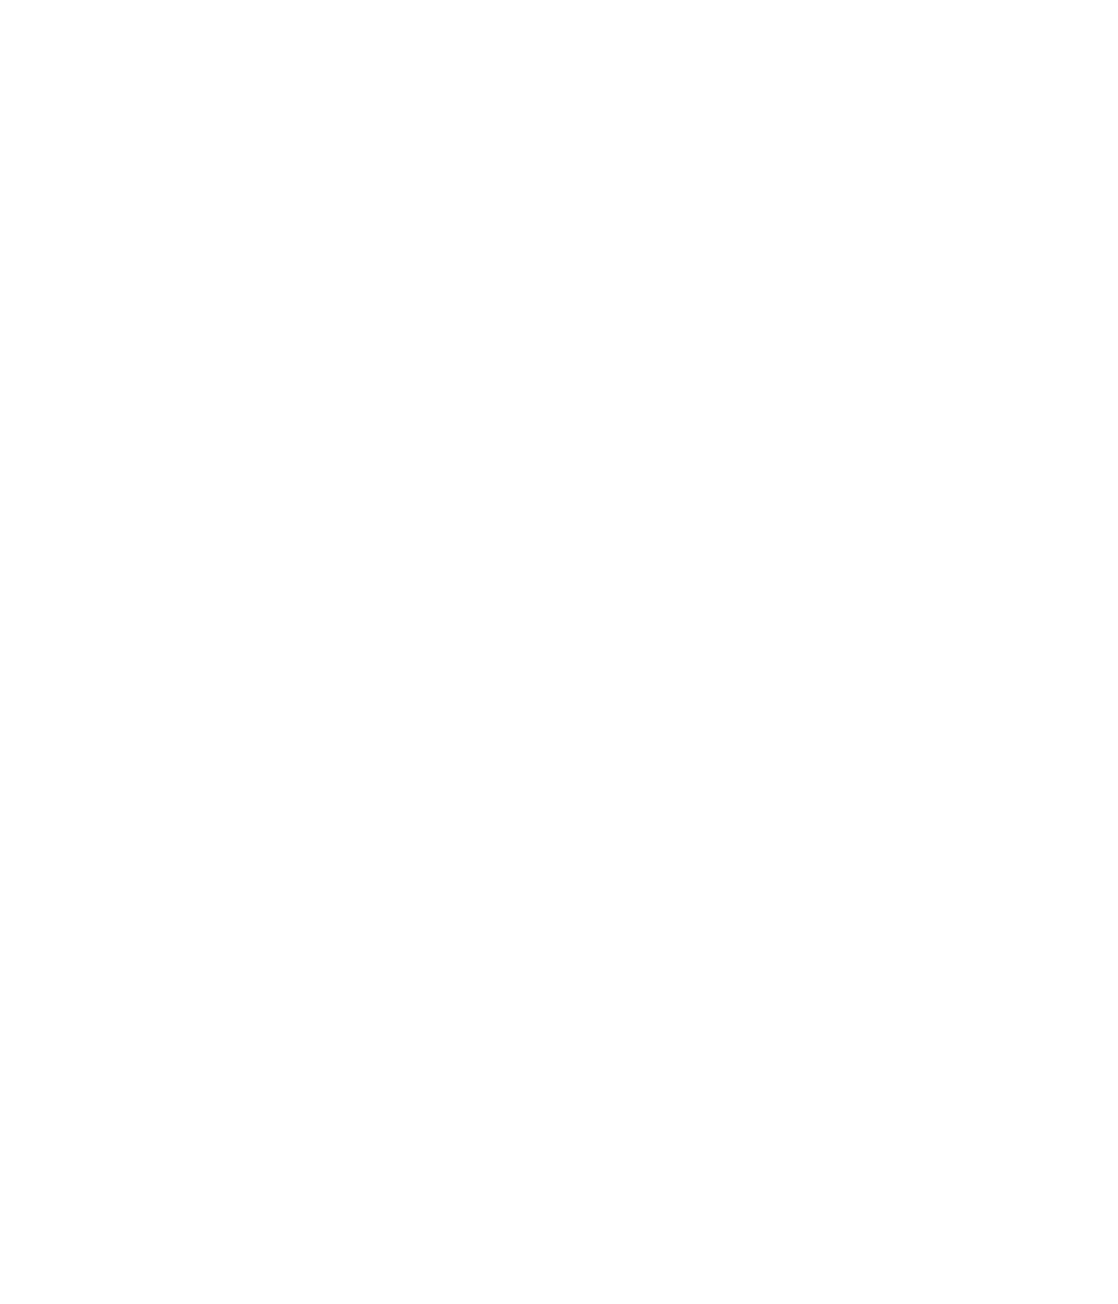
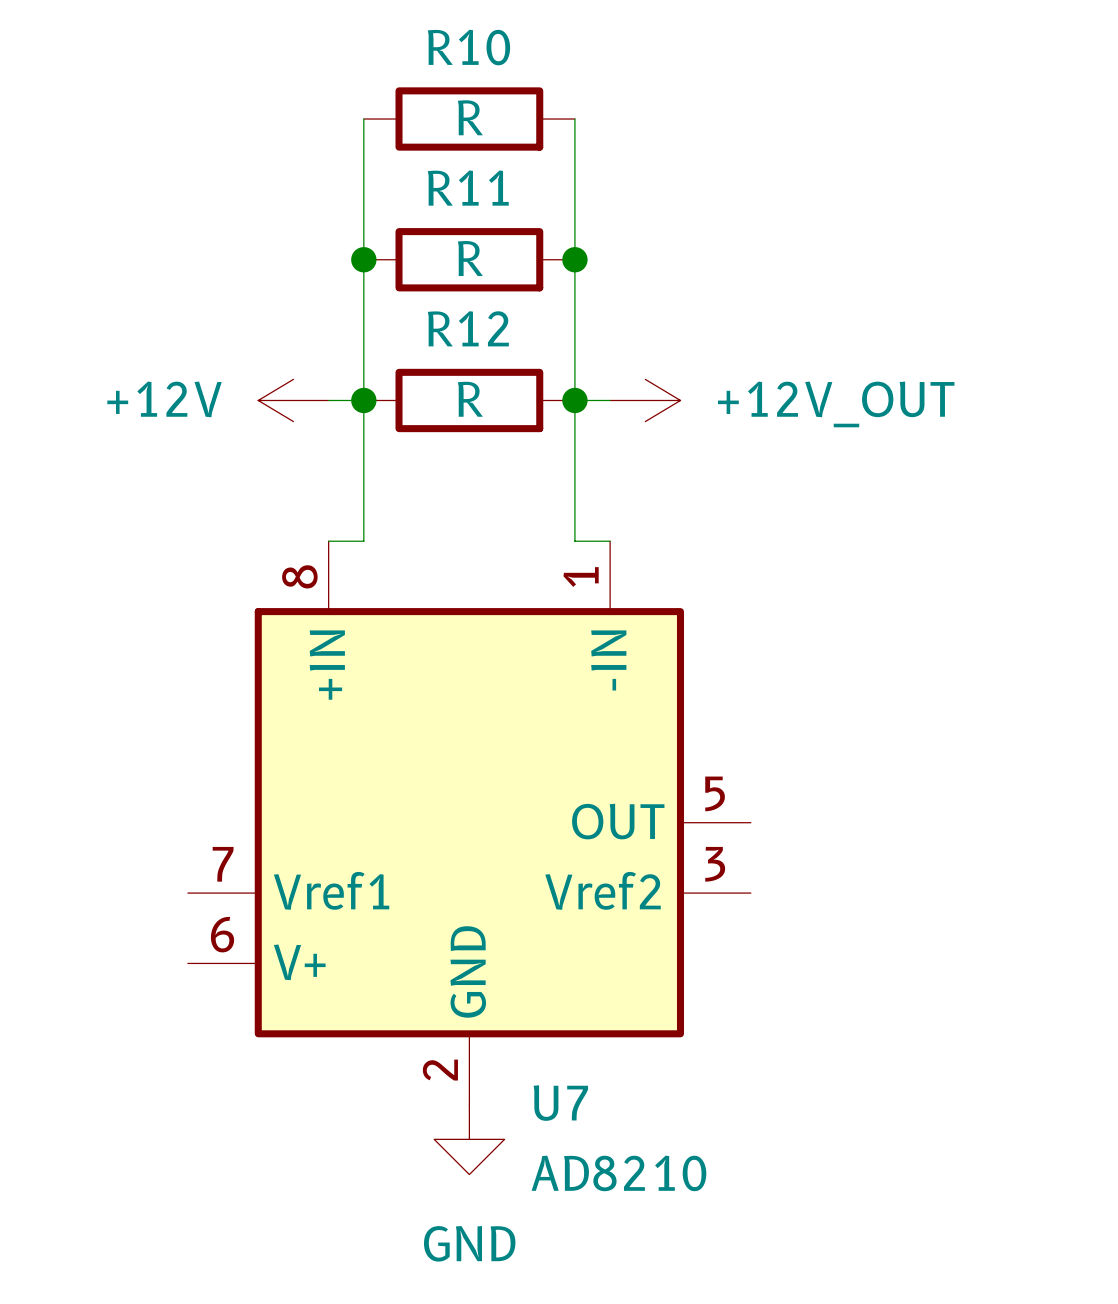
wire: none -> (363, 119) (363, 541) (328, 541)
R10: none -> R (469, 119)
wire: none -> (574, 119) (574, 541) (610, 541)
junction: none -> (363, 259)
R11: none -> R (469, 259)
junction: none -> (574, 259)
power symbol: none -> +12V (293, 400)
wire: none -> (328, 400) (363, 400)
junction: none -> (363, 400)
R12: none -> R (469, 400)
wire: none -> (574, 400) (610, 400)
junction: none -> (574, 400)
power symbol: none -> +12V_OUT (645, 400)
U7: none -> AD8210 (469, 822)
power symbol: none -> GND (469, 1139)

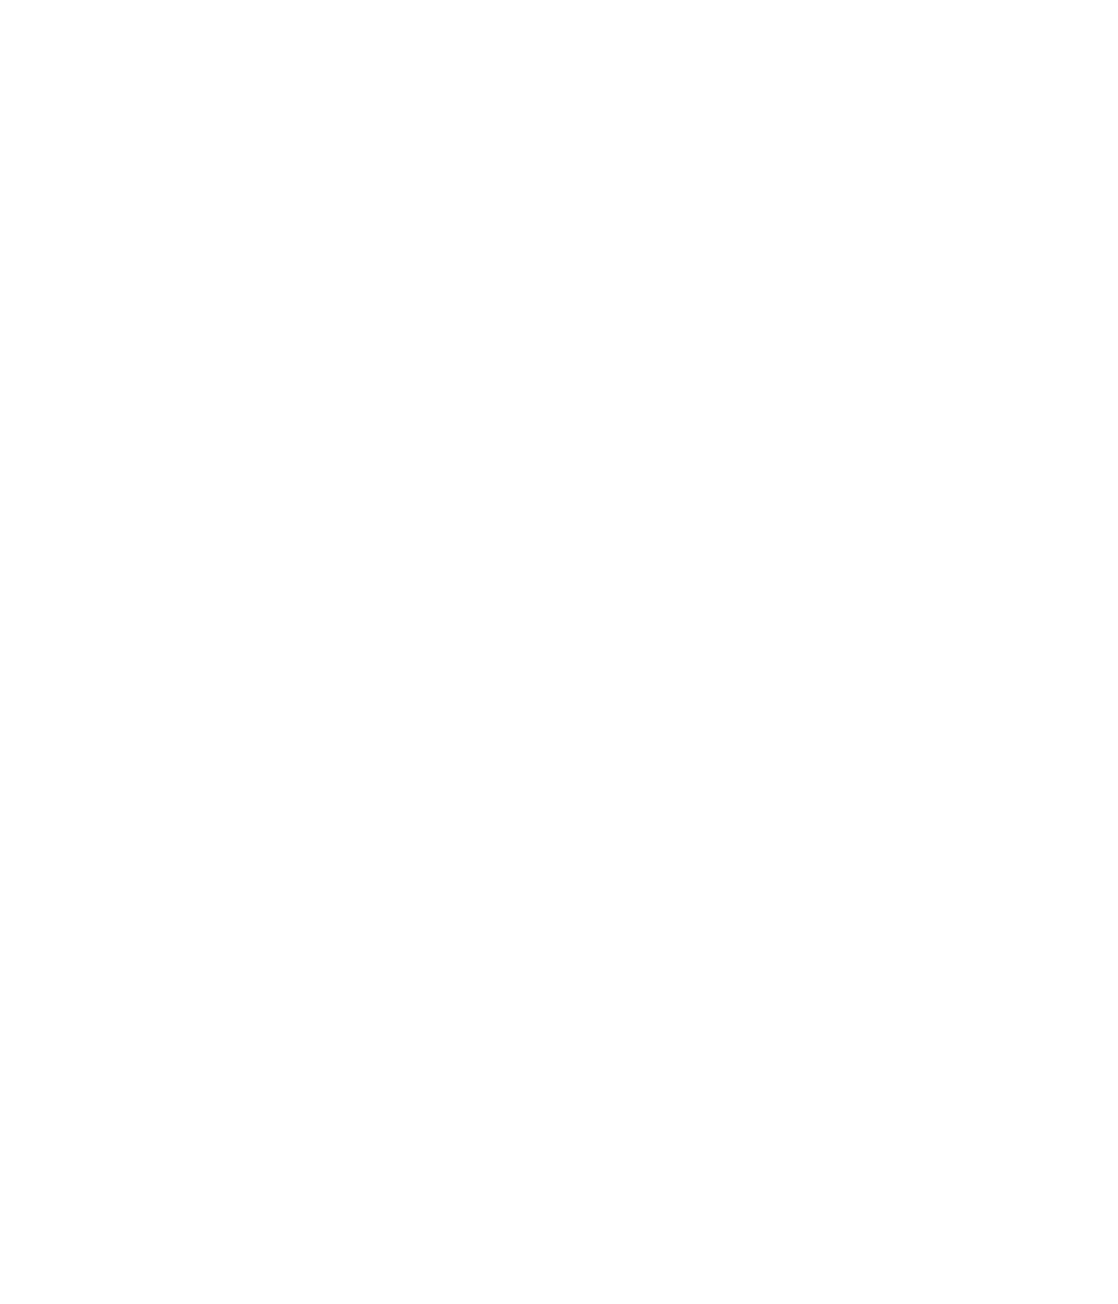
wire: (363, 119) (363, 541) (328, 541) -> none
R10: R (469, 119) -> none
wire: (574, 119) (574, 541) (610, 541) -> none
junction: (363, 259) -> none
R11: R (469, 259) -> none
junction: (574, 259) -> none
power symbol: +12V (293, 400) -> none
wire: (328, 400) (363, 400) -> none
junction: (363, 400) -> none
R12: R (469, 400) -> none
wire: (574, 400) (610, 400) -> none
junction: (574, 400) -> none
power symbol: +12V_OUT (645, 400) -> none
U7: AD8210 (469, 822) -> none
power symbol: GND (469, 1139) -> none

